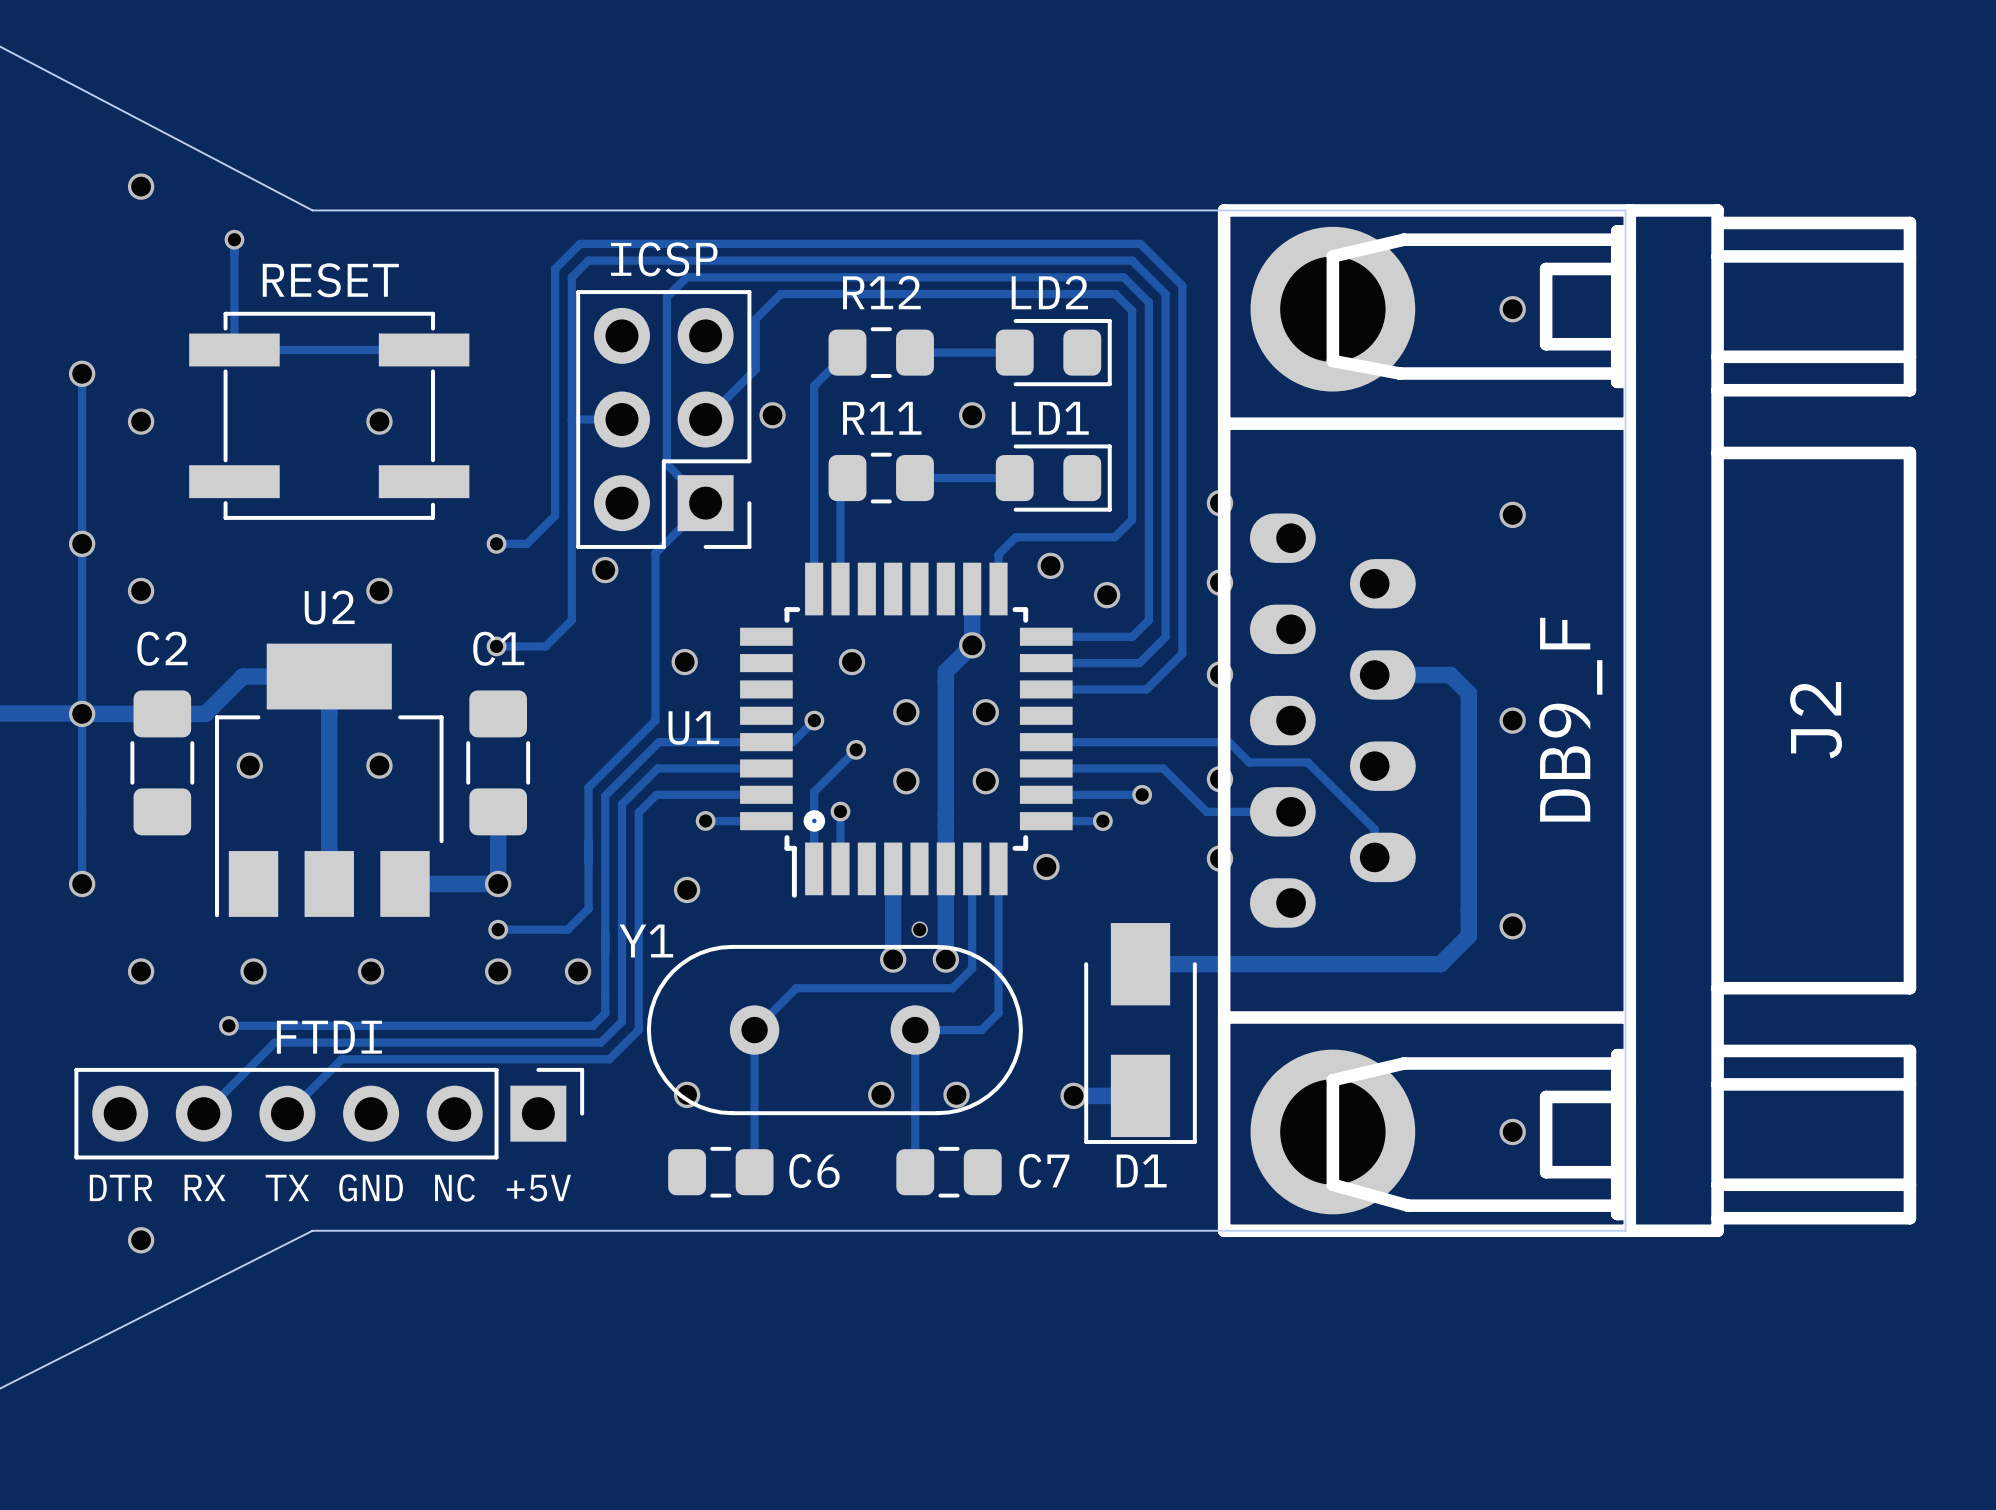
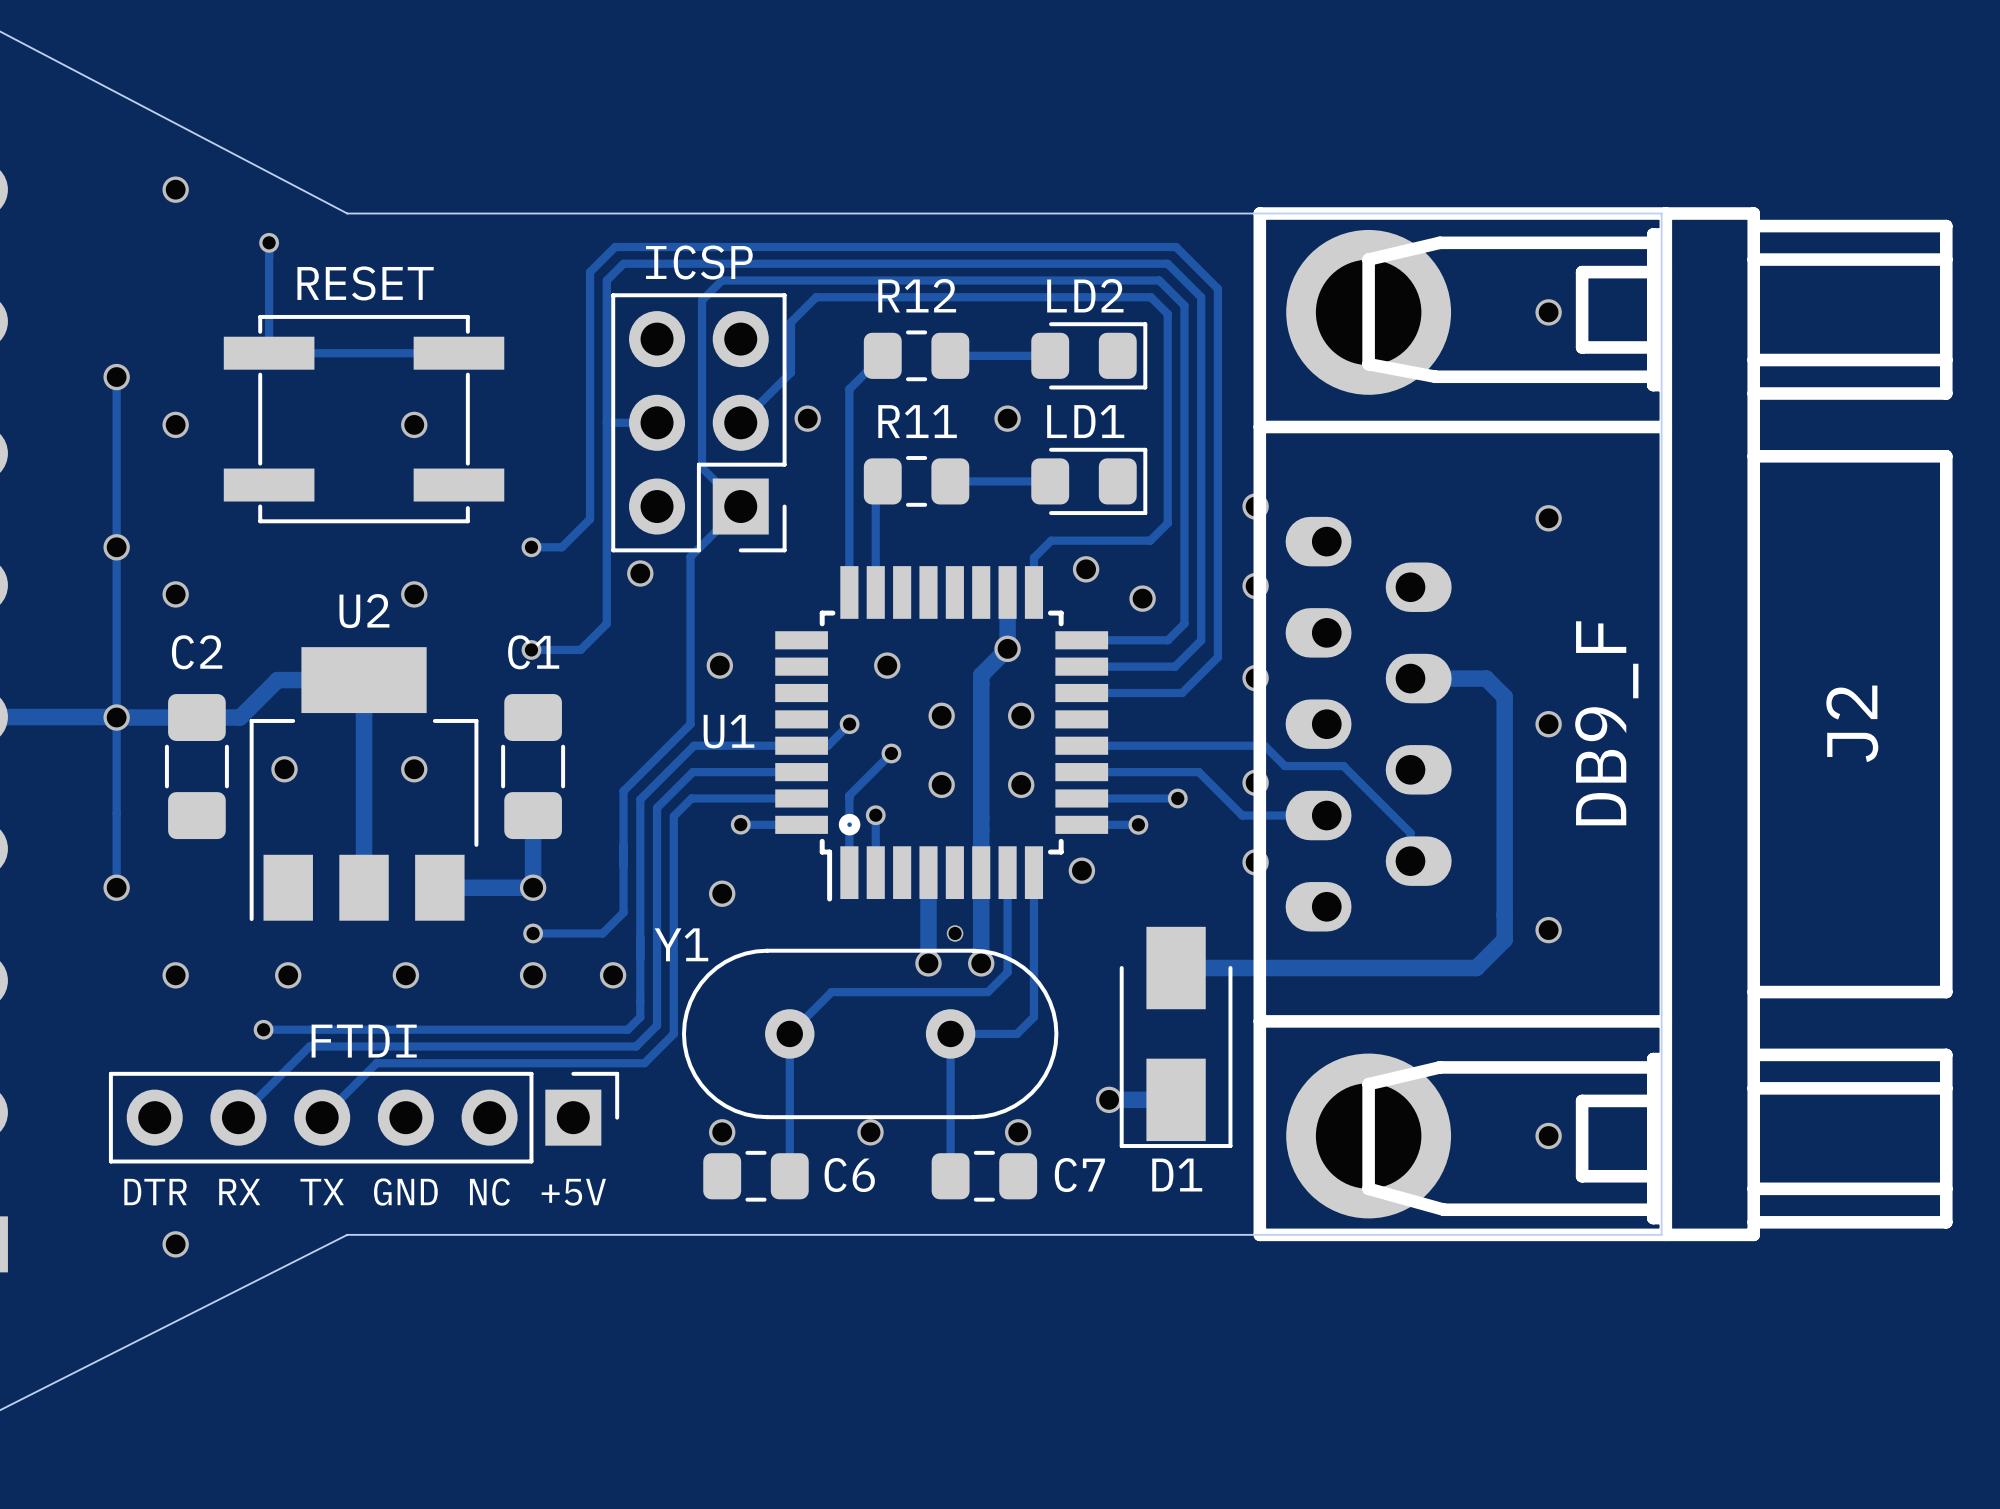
via position: (687, 1094) -> (722, 1132)
via: (881, 1094) -> none
via position: (956, 1094) -> (1018, 1132)
via: none -> (870, 1132)

